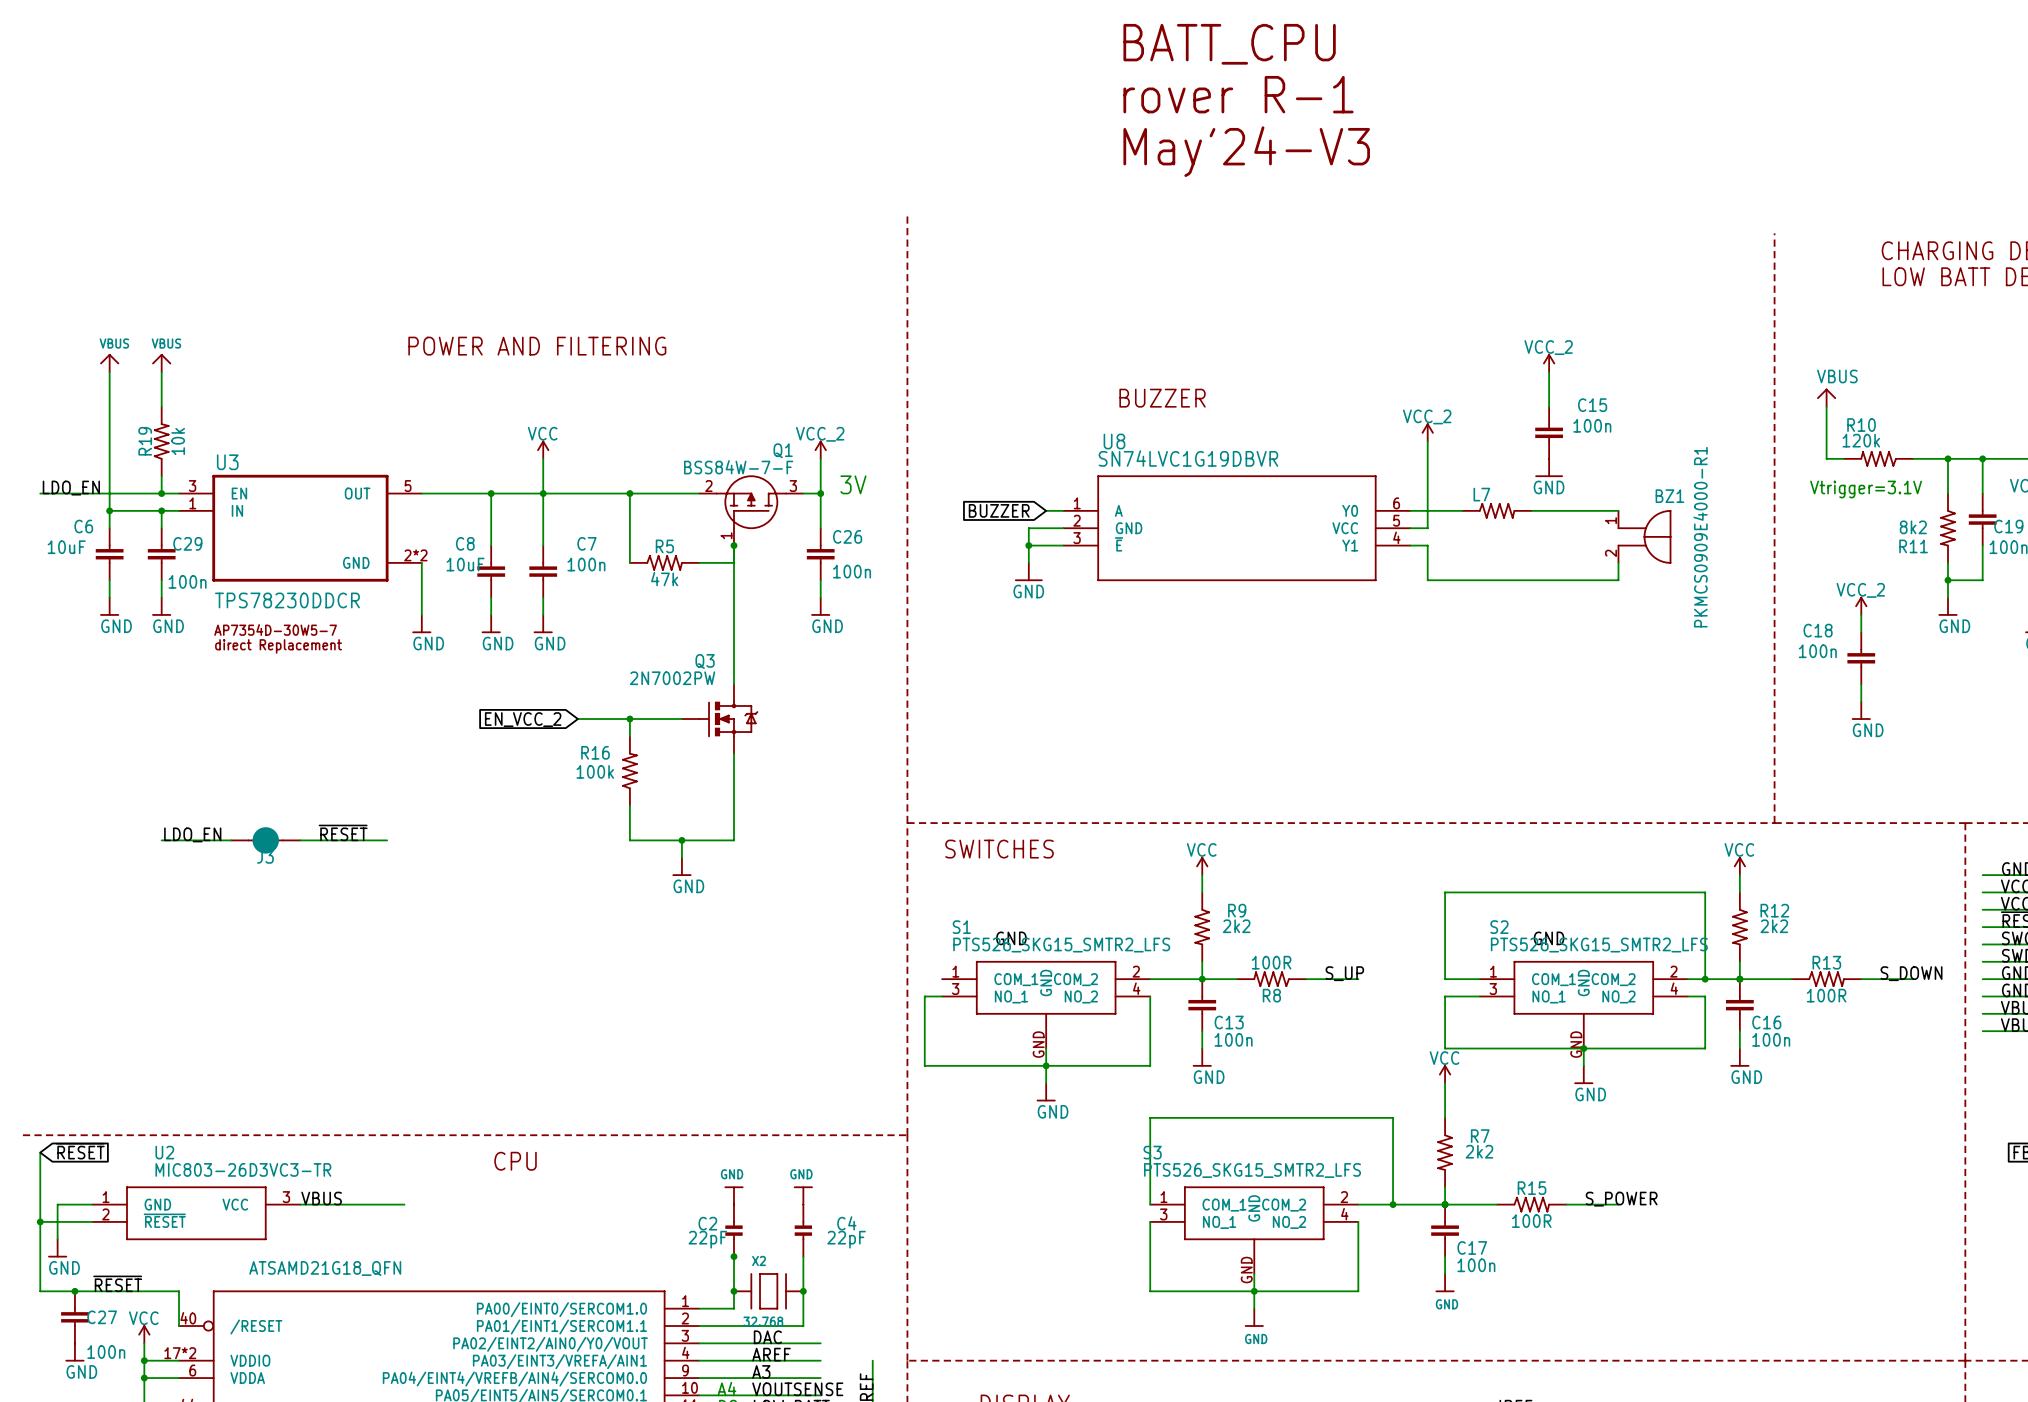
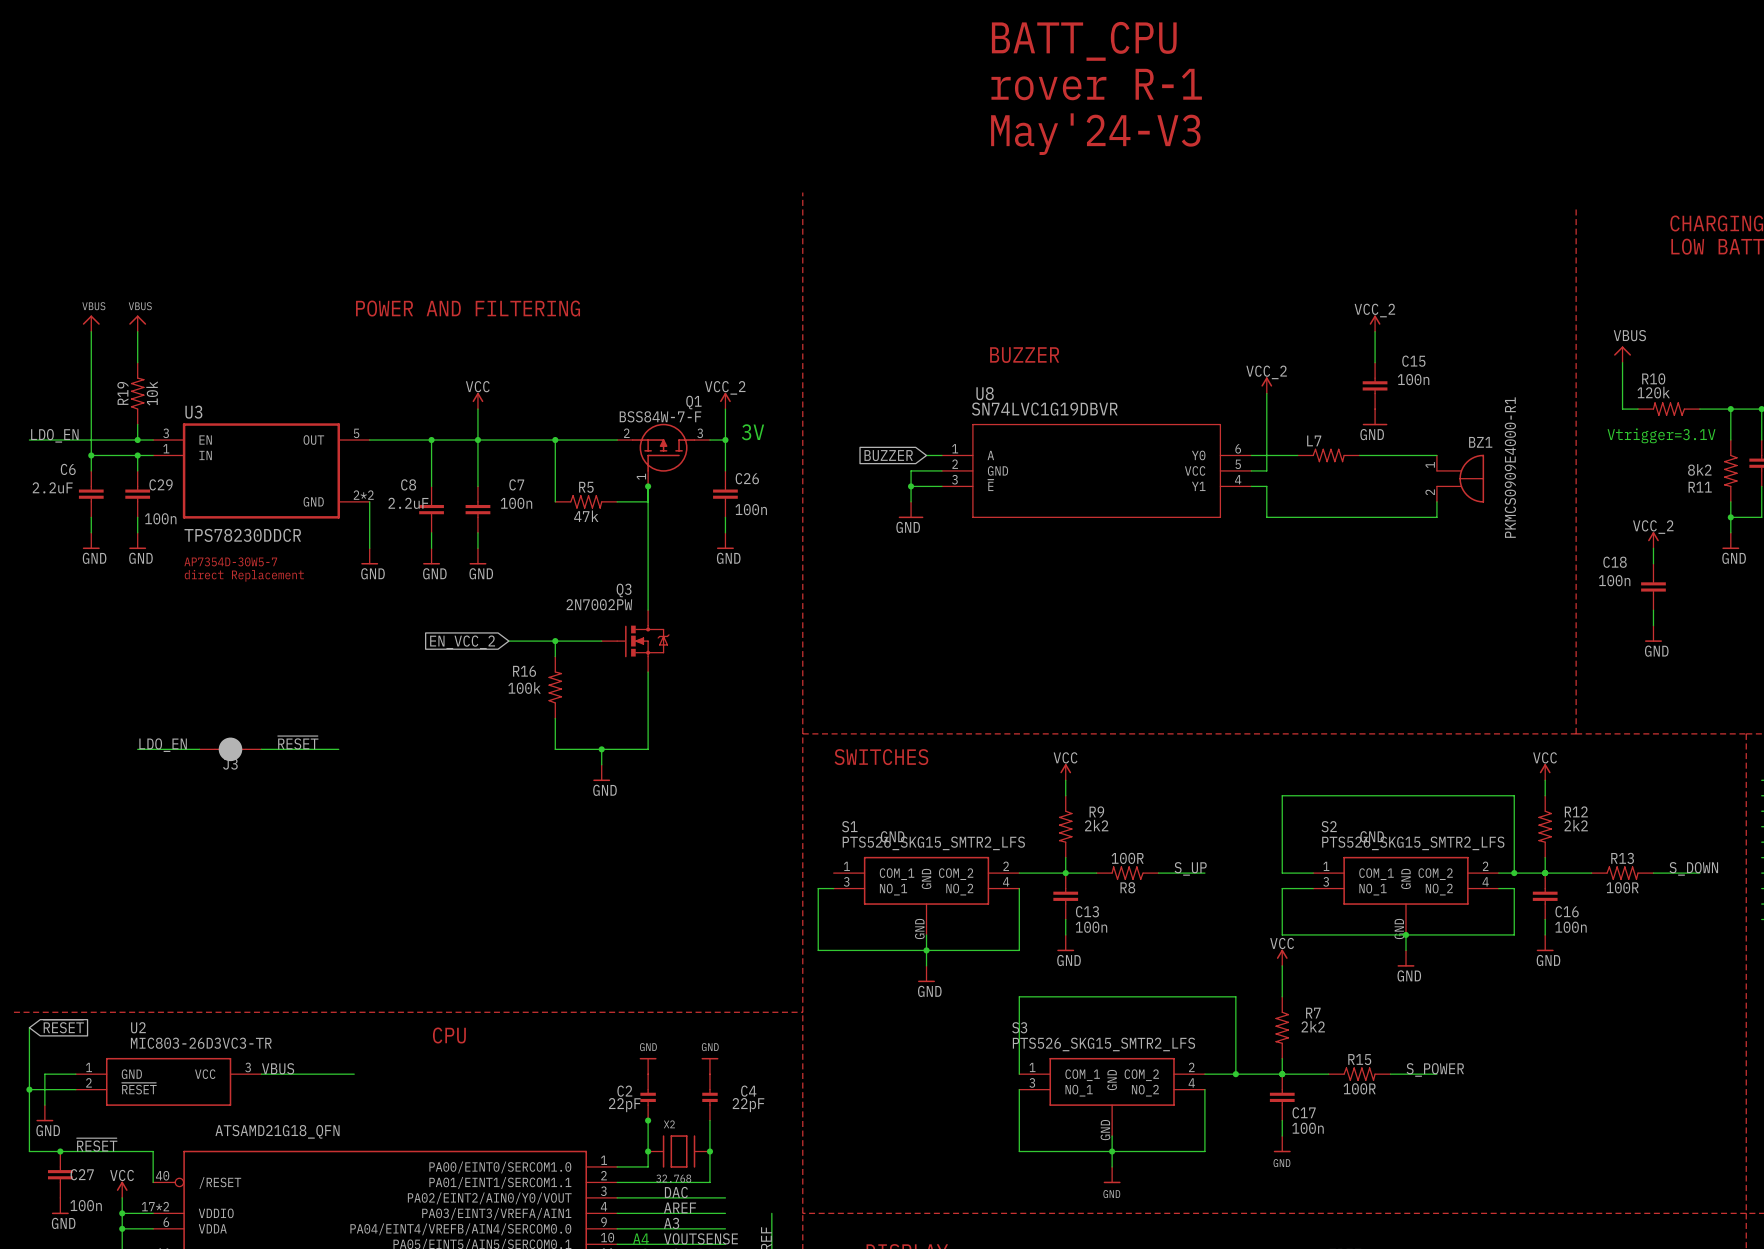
C6 value: 10uF (66, 547) -> 2.2uF (52, 487)
C8 value: 10uF (465, 564) -> 2.2uF (408, 503)

